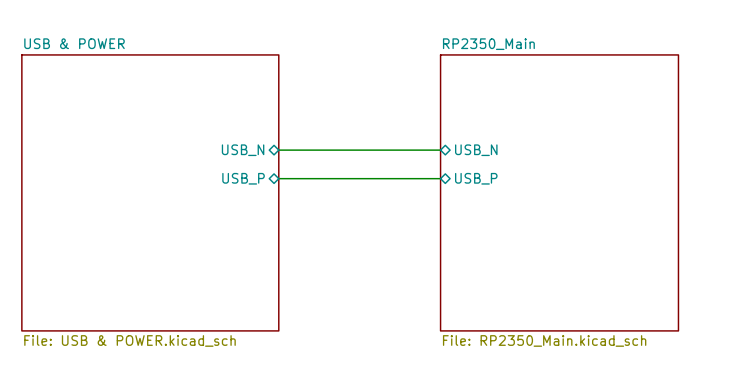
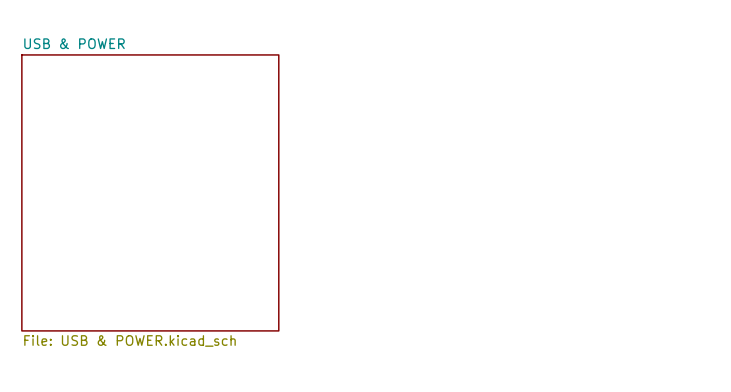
sheet pin: USB_N (243, 150) -> none
wire: (278, 150) (440, 150) -> none
sheet pin: USB_N (476, 150) -> none
sheet pin: USB_P (243, 178) -> none
wire: (278, 178) (440, 178) -> none
sheet pin: USB_P (476, 178) -> none
sheet RP2350_Main: File: RP2350_Main.kicad_sch (559, 192) -> none

